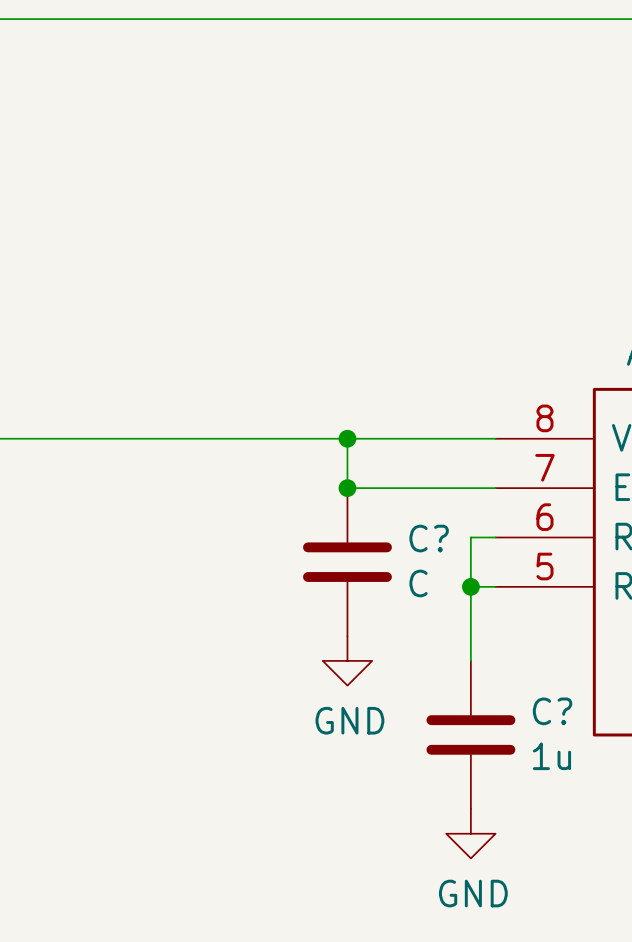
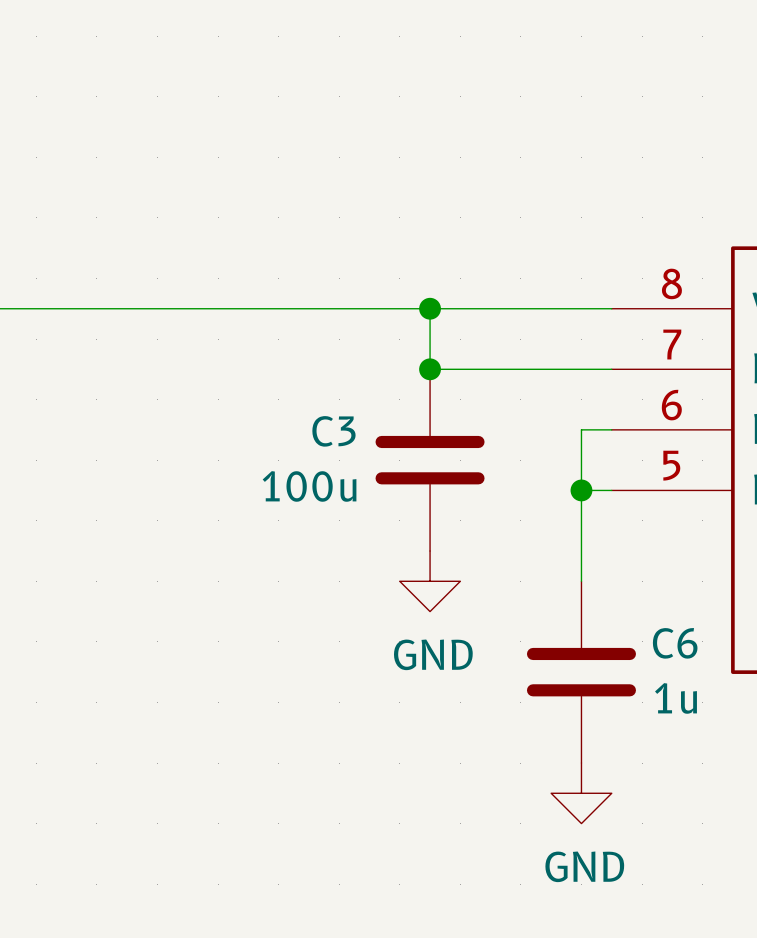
C? name: C? (429, 538) -> C3 (333, 431)
C? value: C (418, 583) -> 100u (309, 486)
C? name: C? (552, 711) -> C6 (675, 643)

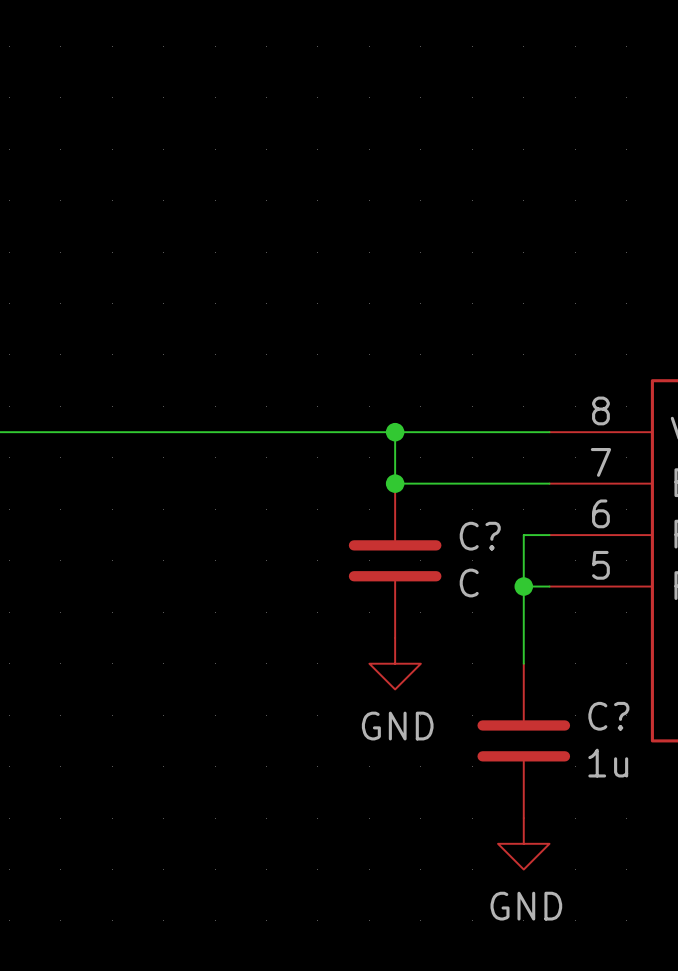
C3 name: C3 (333, 431) -> C? (480, 536)
C3 value: 100u (309, 486) -> C (469, 583)
C6 name: C6 (675, 643) -> C? (608, 716)

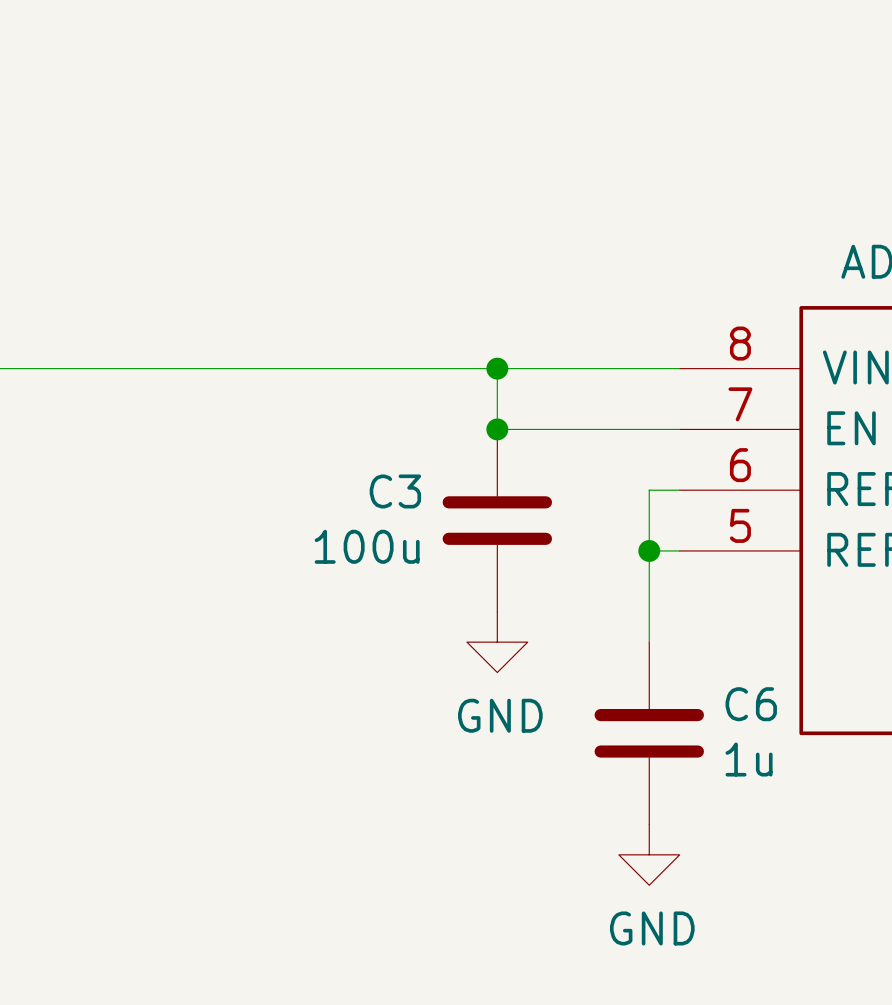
C? name: C? (480, 536) -> C3 (395, 491)
C? value: C (469, 583) -> 100u (367, 546)
C? name: C? (608, 716) -> C6 (751, 704)

